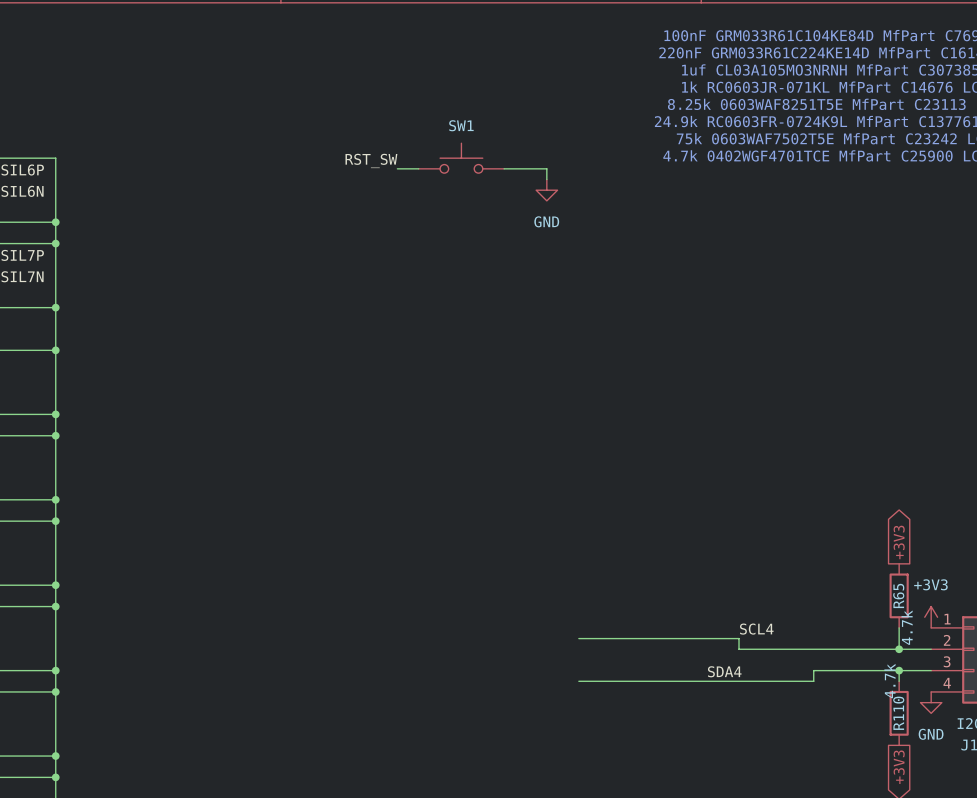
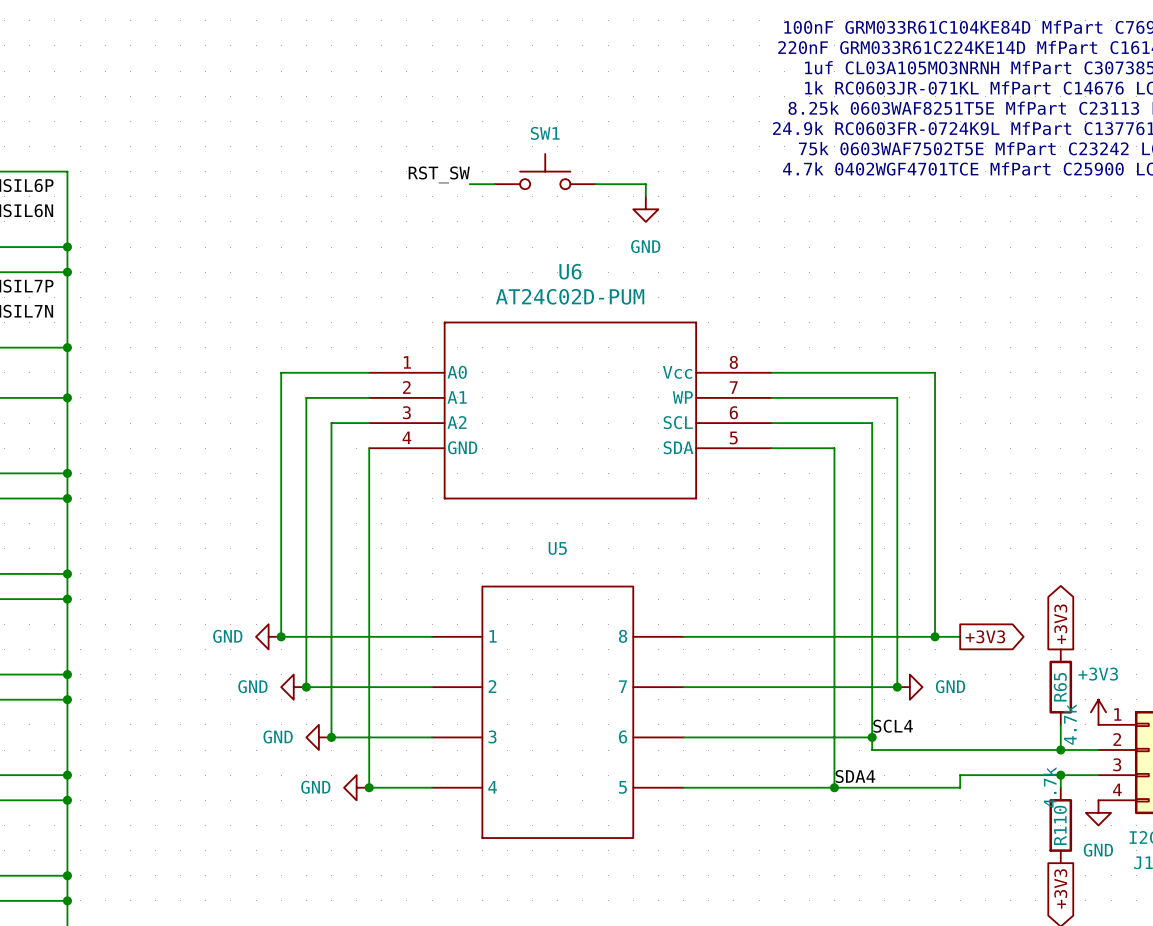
wire: none -> (369, 372) (281, 372) (281, 636) (432, 636)
wire: none -> (771, 372) (935, 372) (935, 636)
wire: none -> (369, 397) (306, 397) (306, 687) (432, 687)
wire: none -> (771, 397) (897, 397) (897, 687) (683, 687)
U6: none -> AT24C02D-PUM (570, 410)
wire: none -> (369, 423) (331, 423) (331, 737) (432, 737)
wire: none -> (771, 423) (872, 423) (872, 737)
wire: none -> (369, 448) (369, 787) (432, 787)
wire: none -> (771, 448) (834, 448) (834, 787)
power symbol: none -> GND (268, 636)
junction: none -> (281, 636)
wire: none -> (683, 636) (960, 636)
junction: none -> (935, 636)
global label: none -> +3V3 (985, 636)
power symbol: none -> GND (293, 687)
junction: none -> (306, 687)
junction: none -> (897, 687)
power symbol: none -> GND (909, 687)
U5: none -> (557, 712)
power symbol: none -> GND (318, 737)
junction: none -> (331, 737)
junction: none -> (872, 737)
power symbol: none -> GND (356, 787)
junction: none -> (369, 787)
junction: none -> (834, 787)

